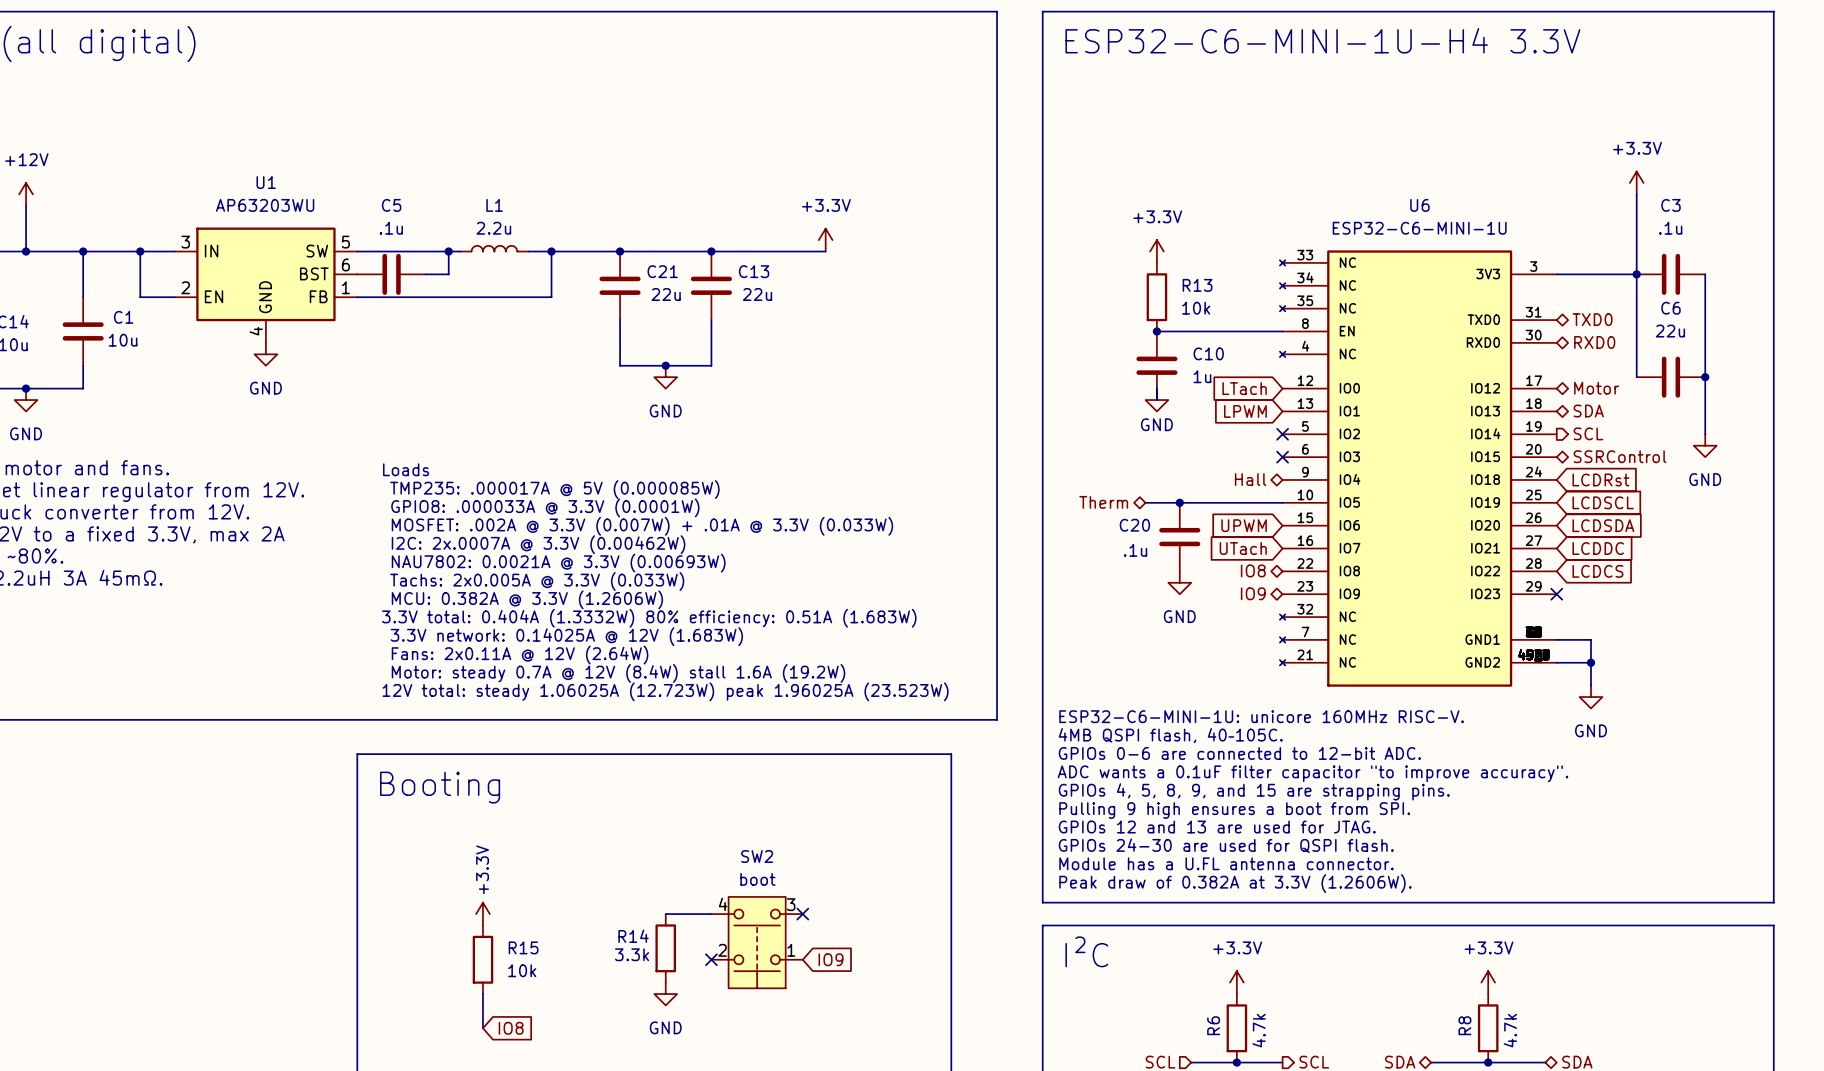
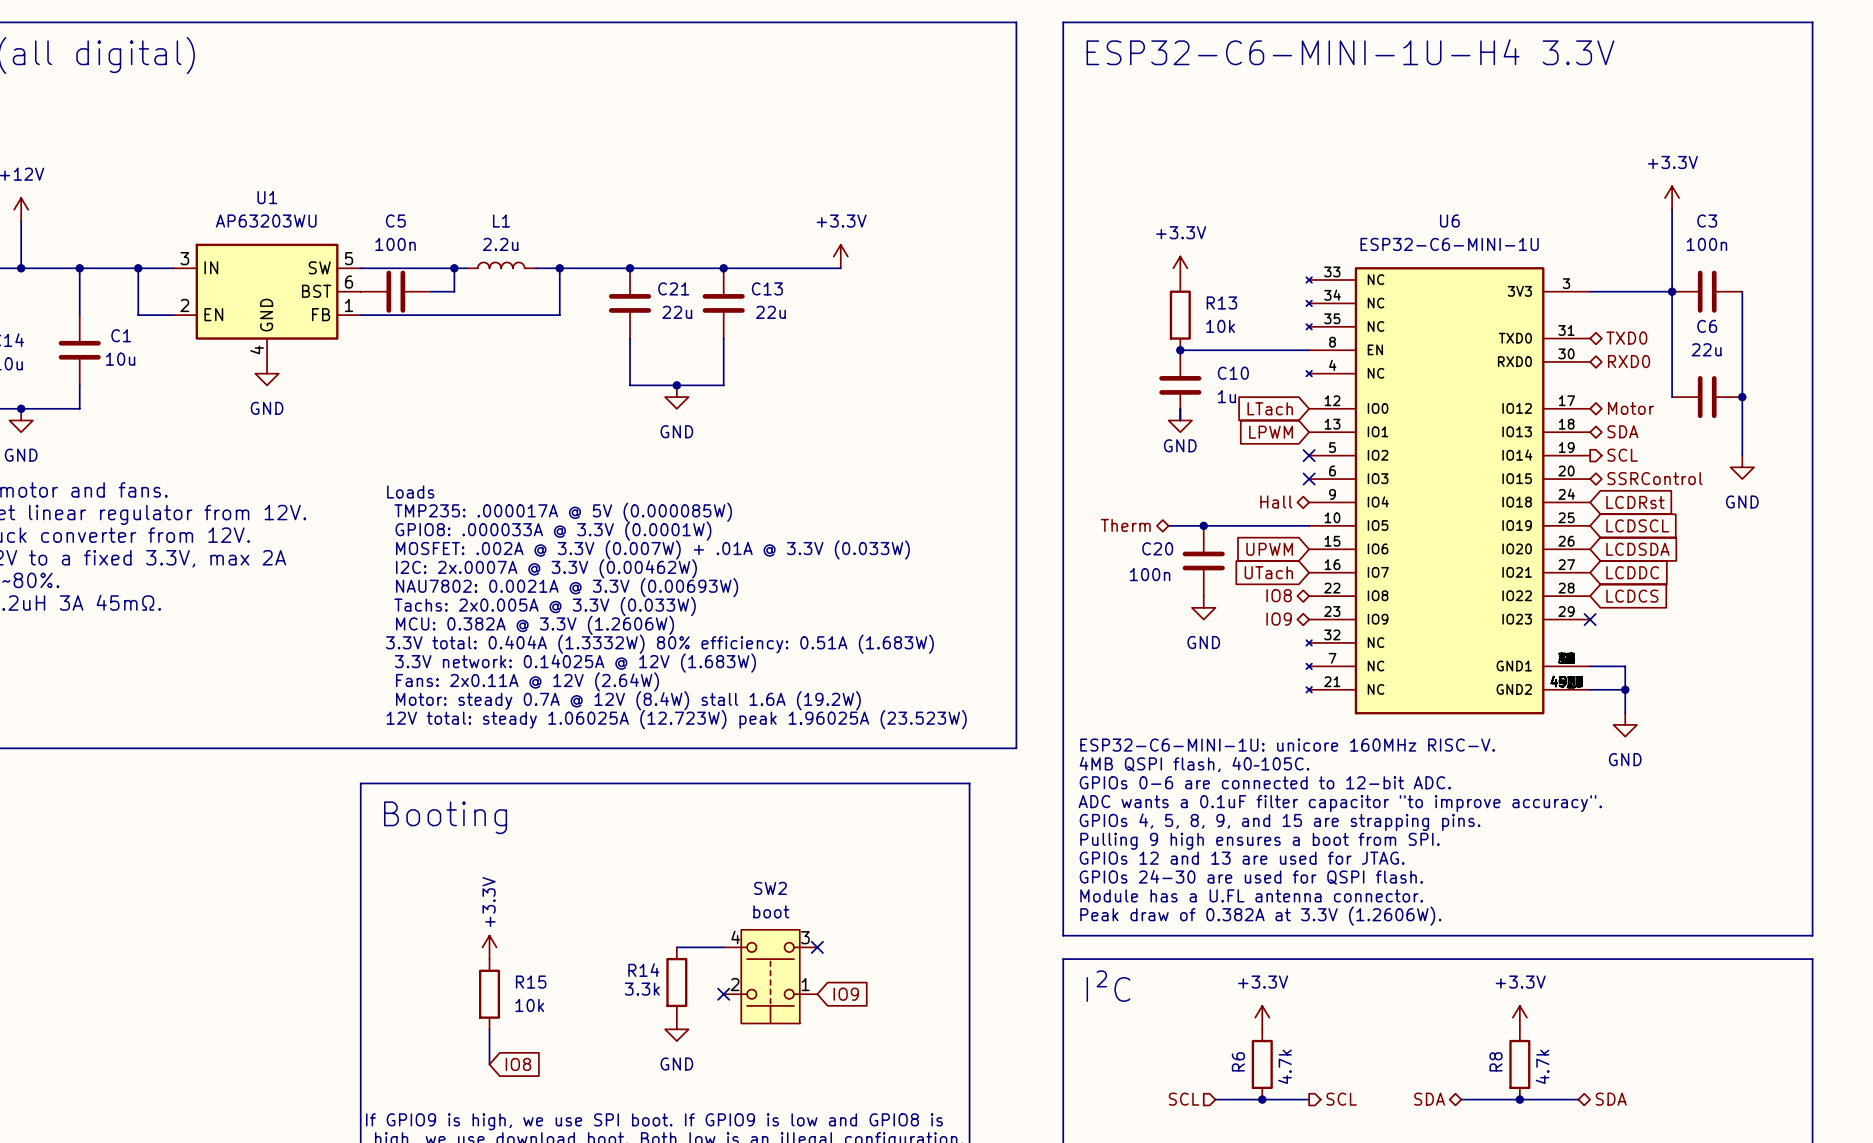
C5 value: .1u (391, 228) -> 100n (395, 244)
C3 value: .1u (1670, 228) -> 100n (1706, 244)
C20 value: .1u (1135, 550) -> 100n (1150, 574)

